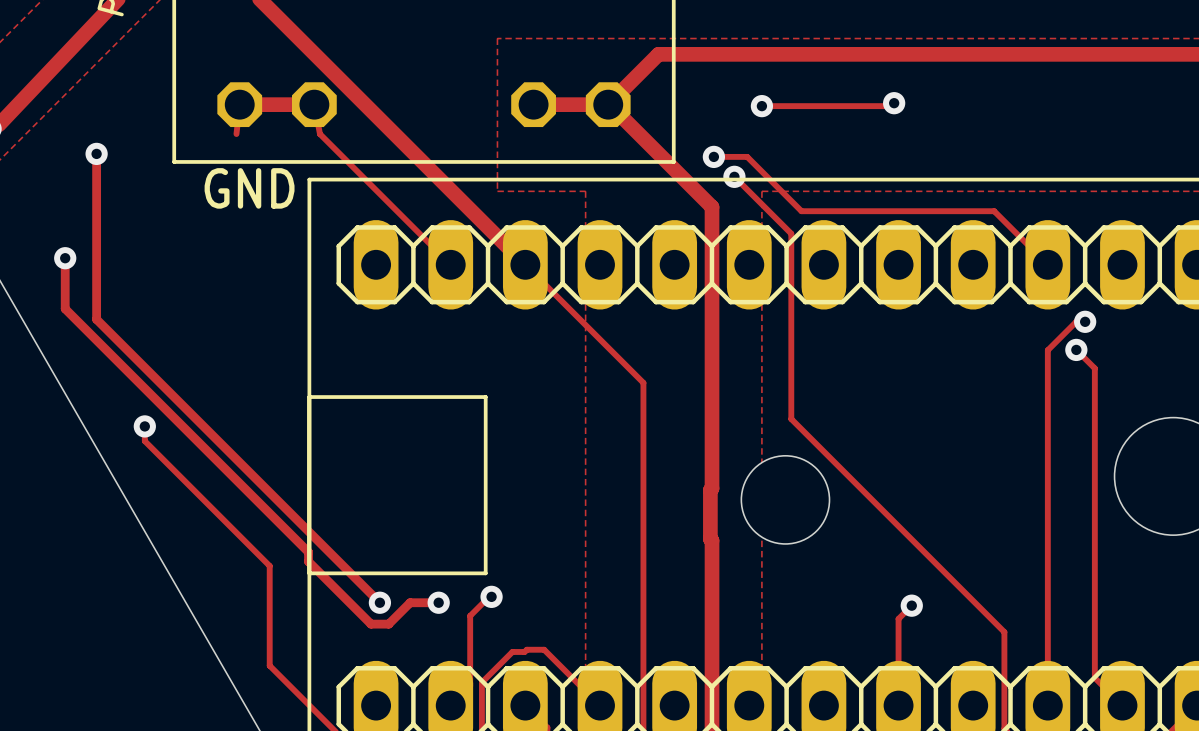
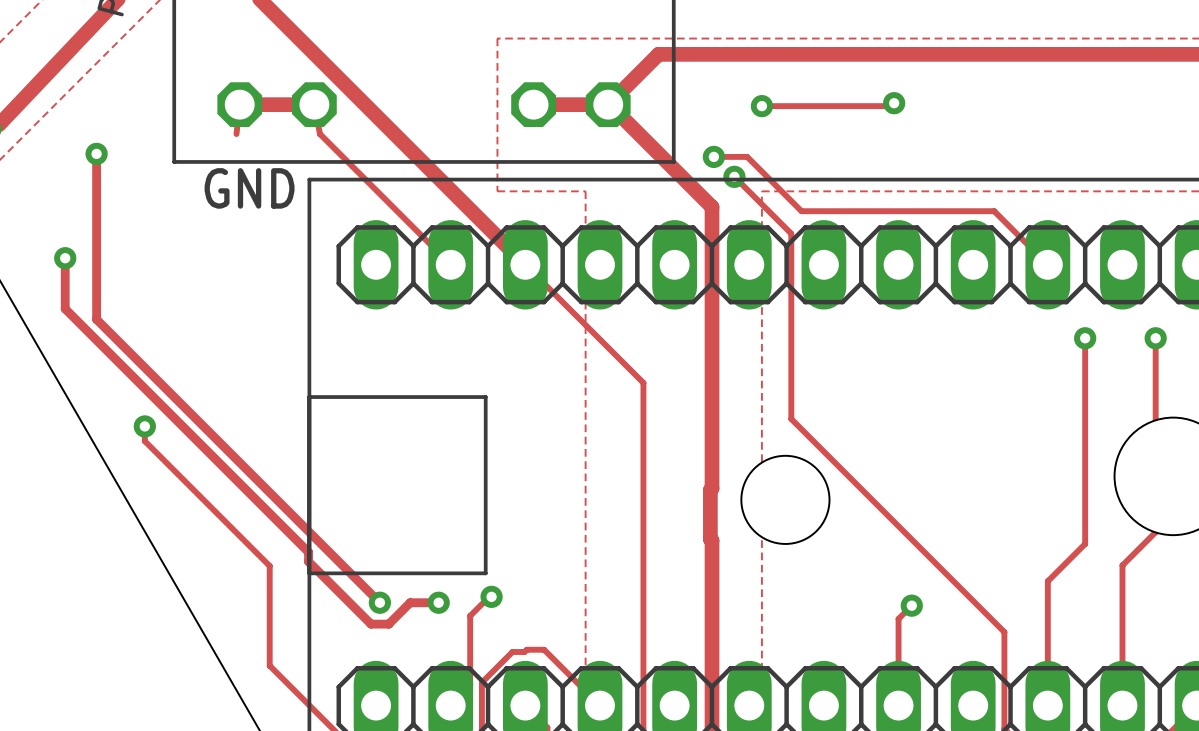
track: (1085, 321) (1076, 321) (1047, 350) (1047, 581) -> (1085, 338) (1085, 543) (1047, 581)
via: (1085, 321) -> none
via: none -> (1085, 338)
via: none -> (1155, 338)
track: (1076, 349) (1094, 368) (1094, 677) (1122, 705) -> (1155, 338) (1155, 532) (1122, 565) (1122, 705)
via: (1076, 349) -> none

